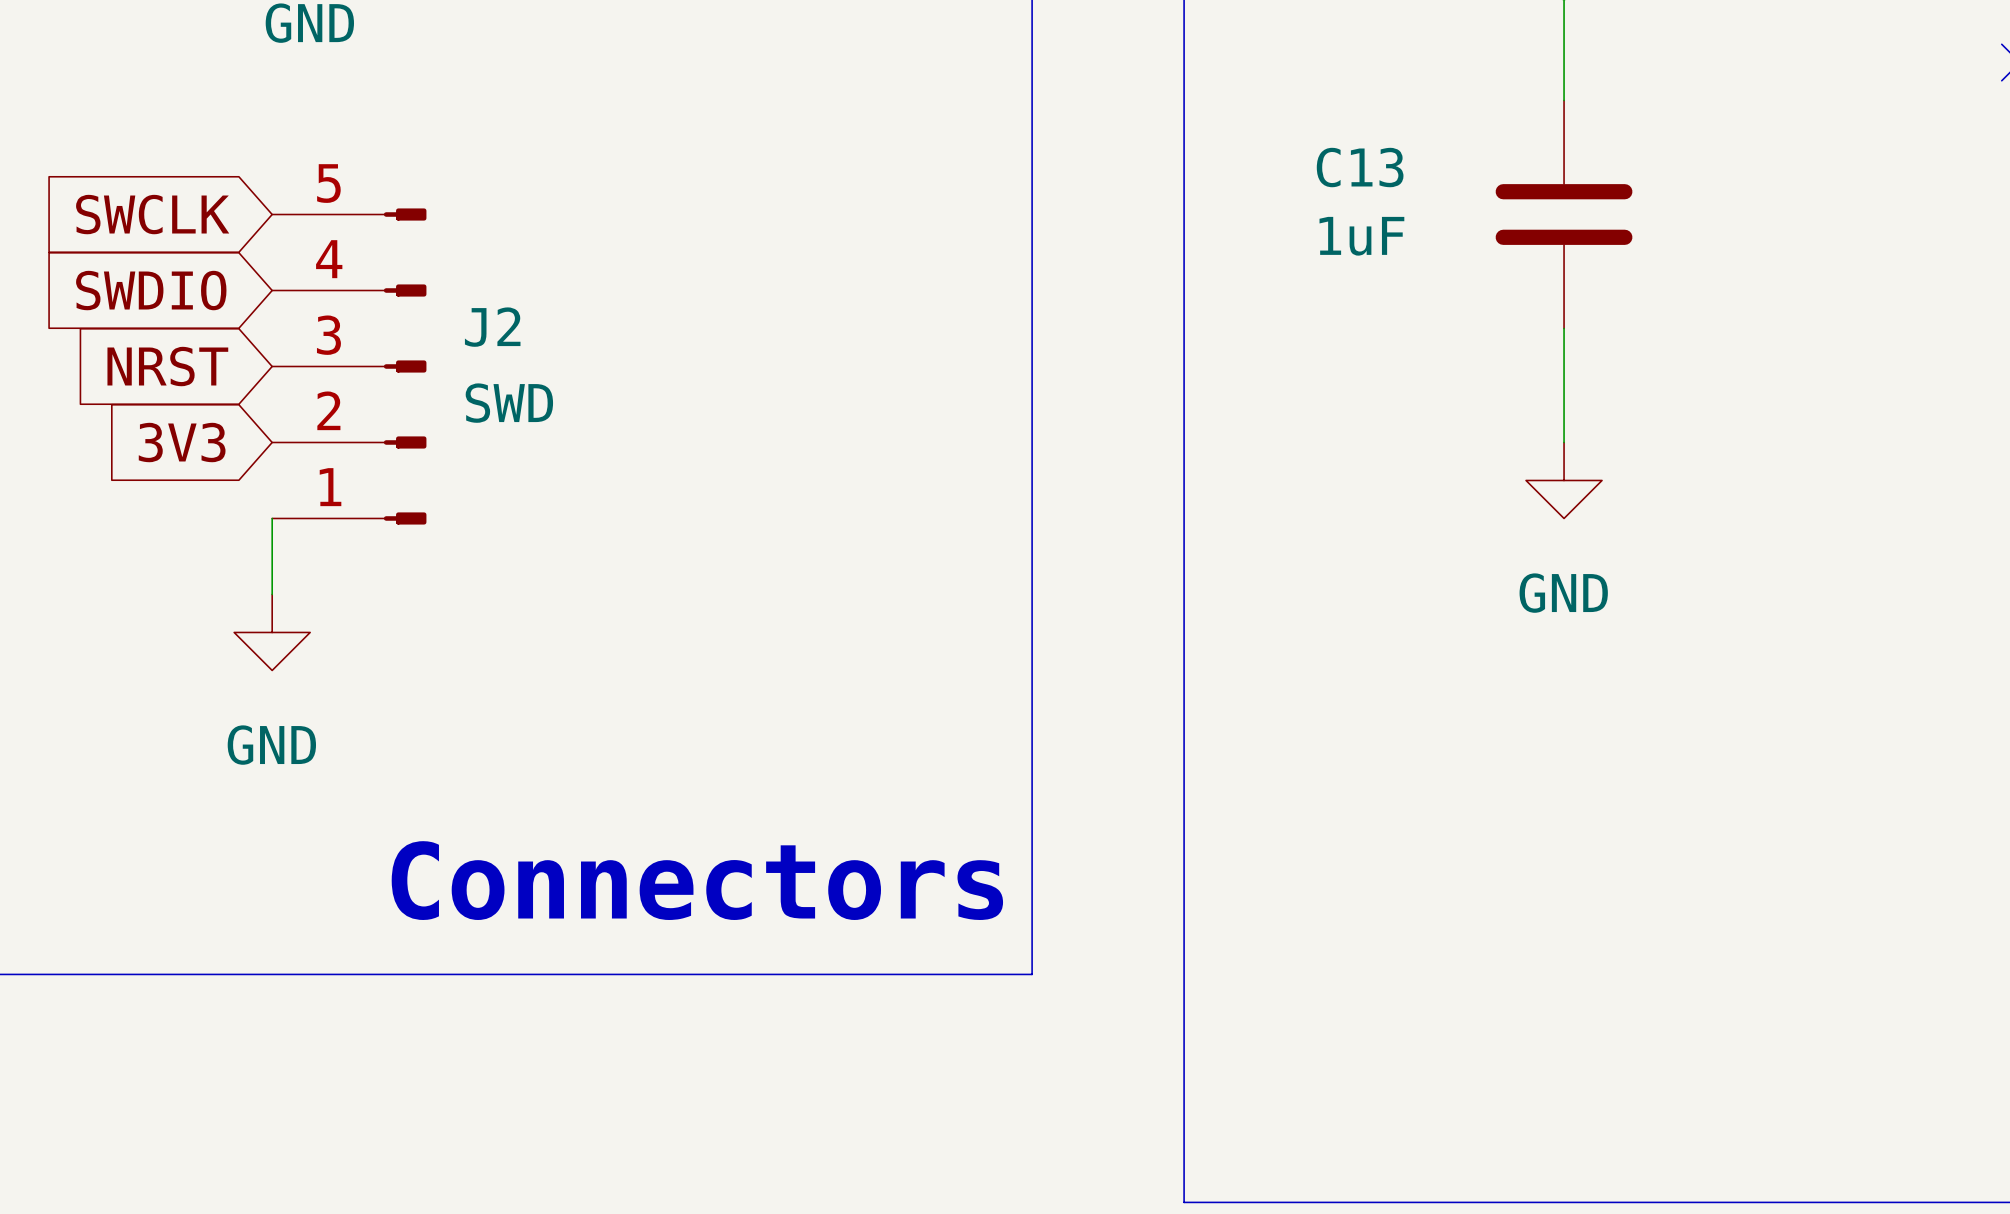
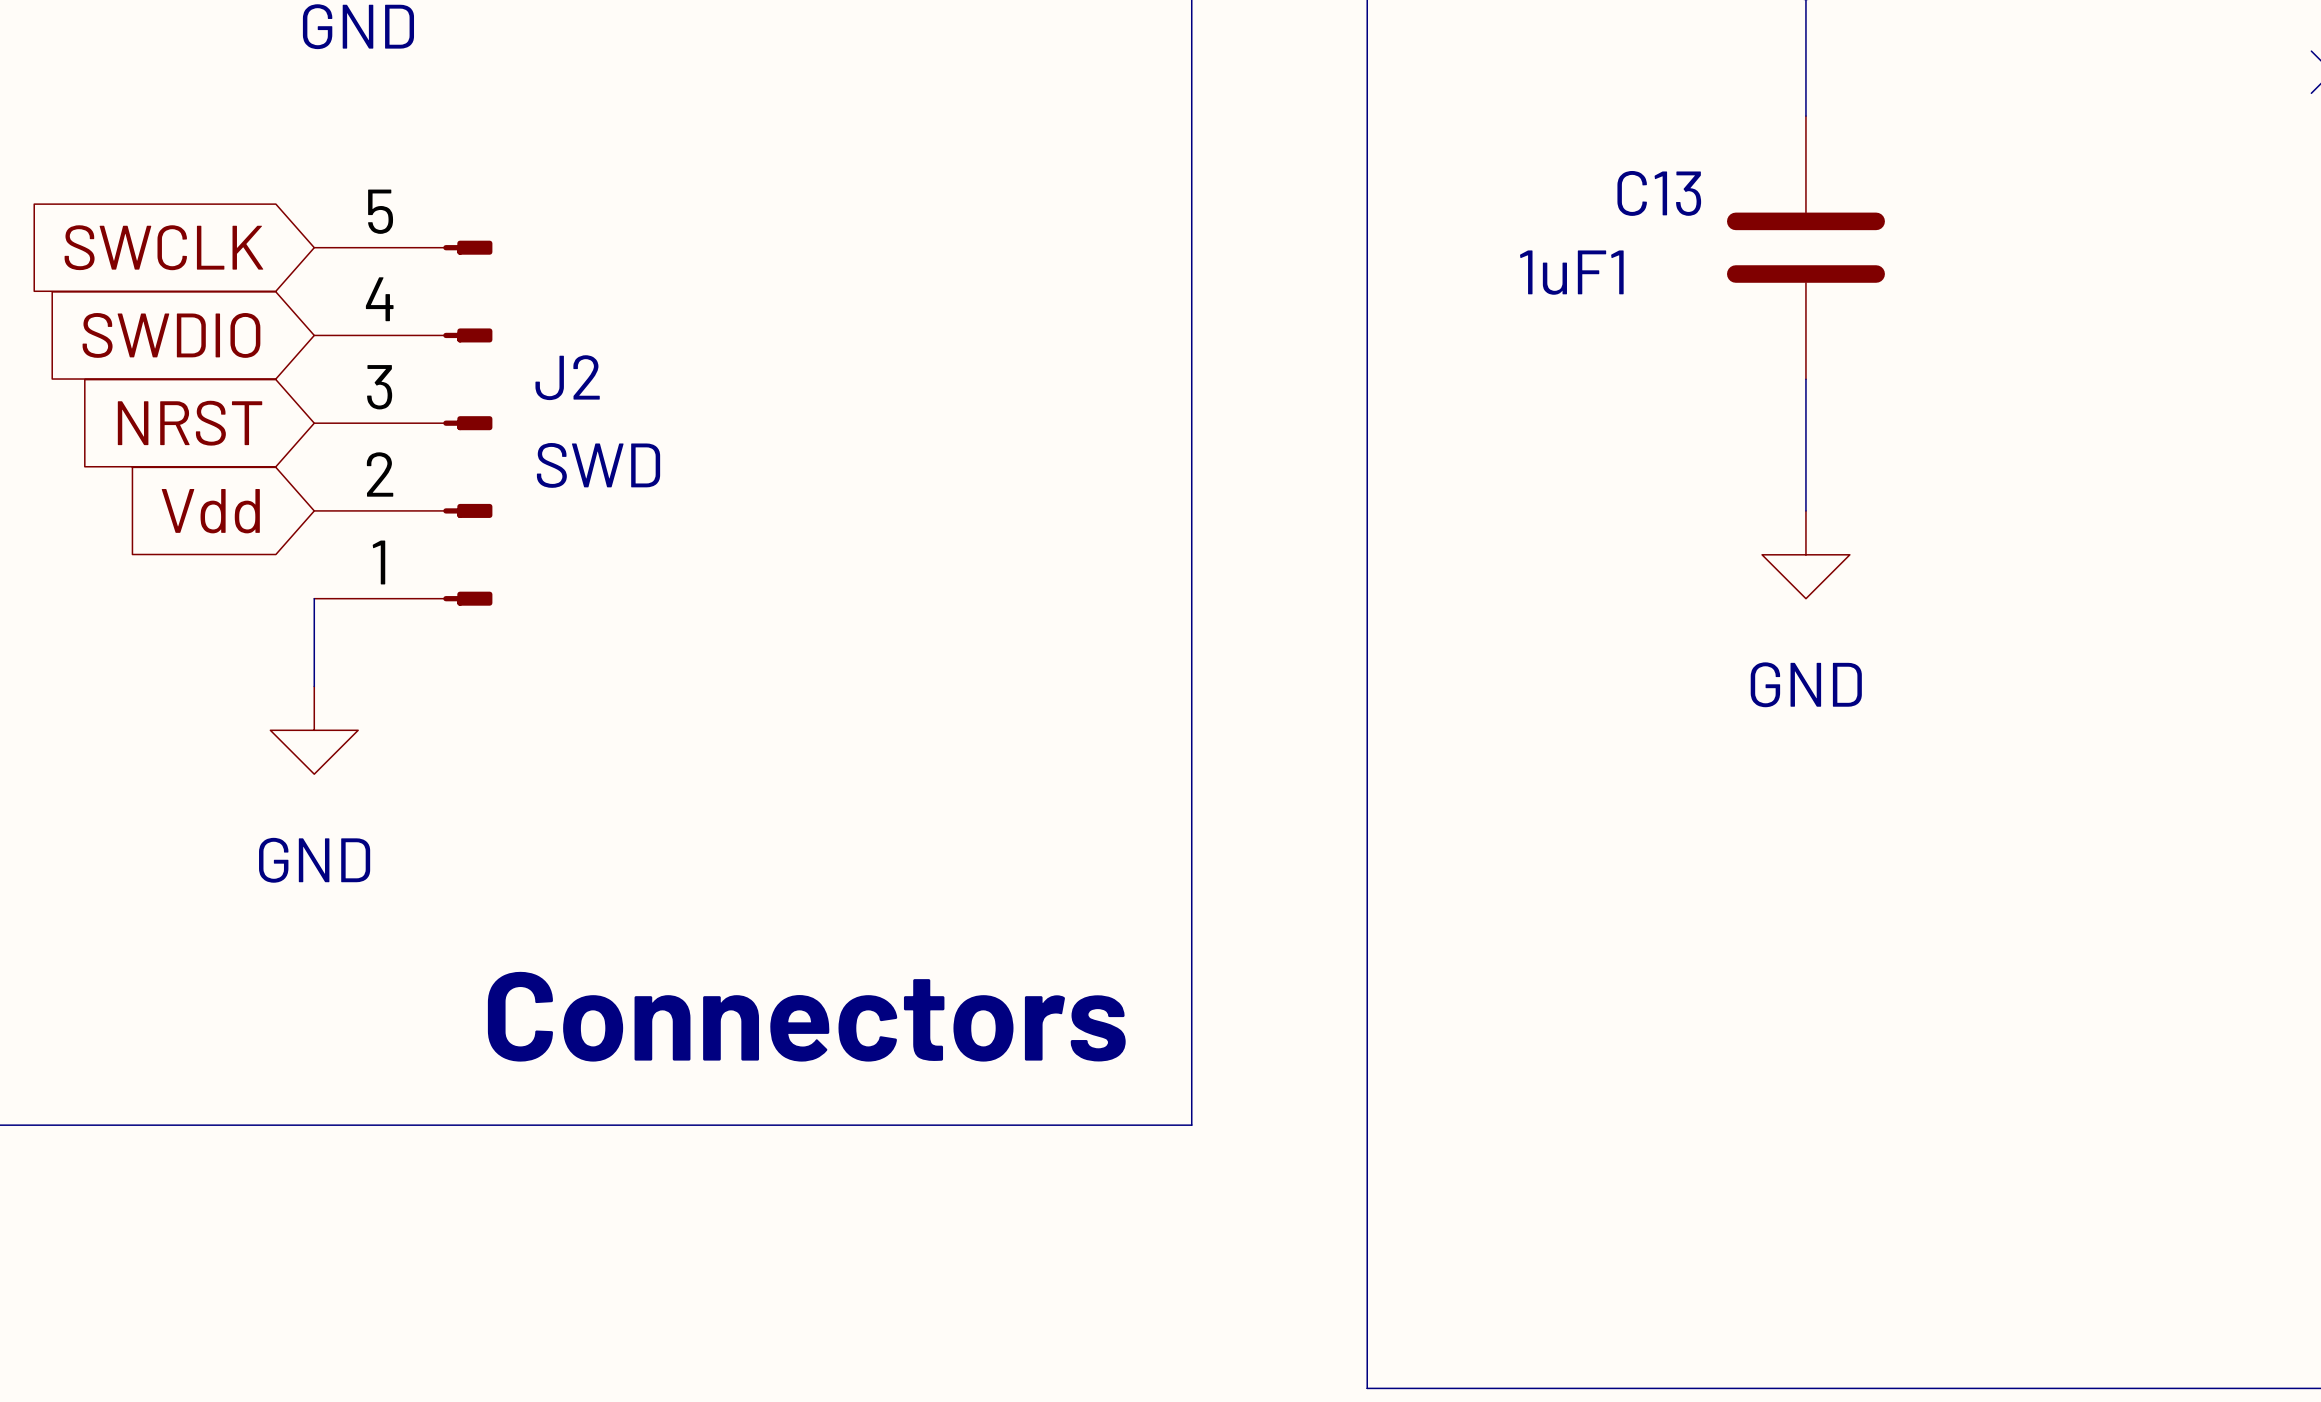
C13 name position: C13 (1360, 167) -> C13 (1659, 193)
C13 value: 1uF (1361, 236) -> 1uF1 (1571, 272)
global label: 3V3 (182, 442) -> Vdd (210, 511)

